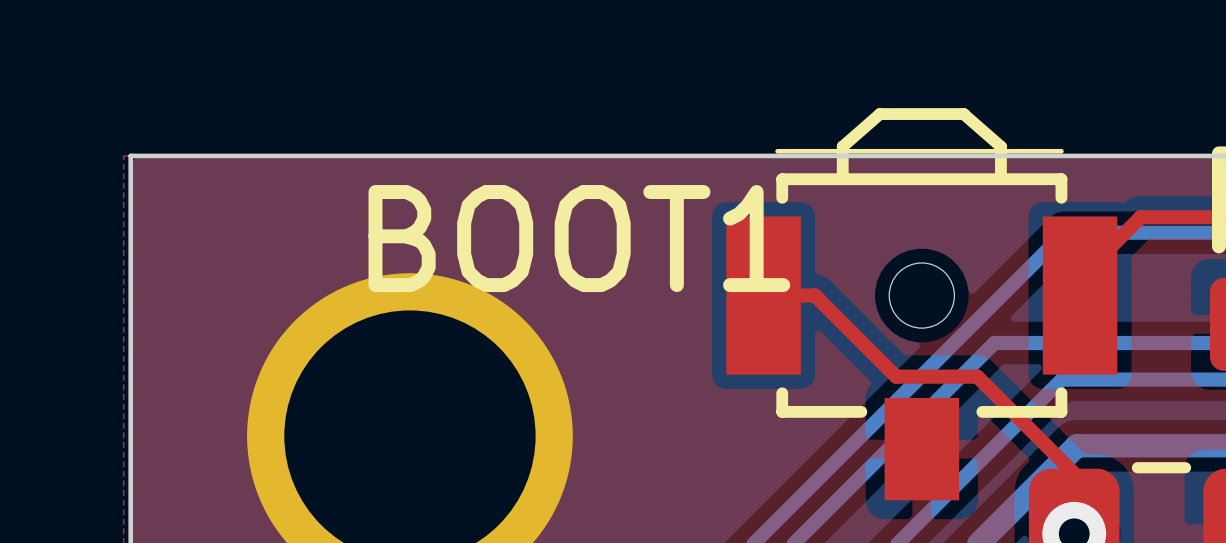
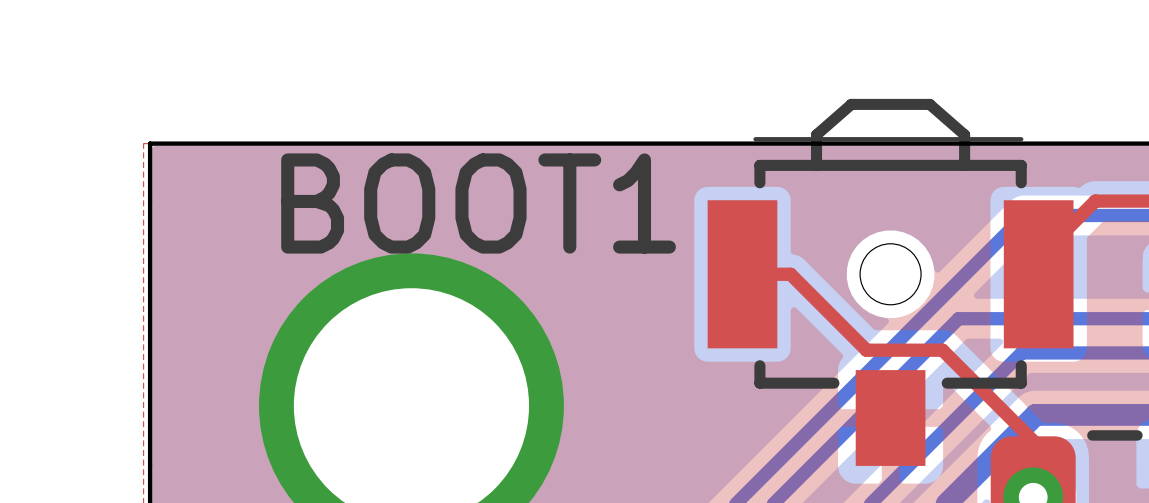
BOOT1 name position: BOOT1 (579, 238) -> BOOT1 (478, 203)

